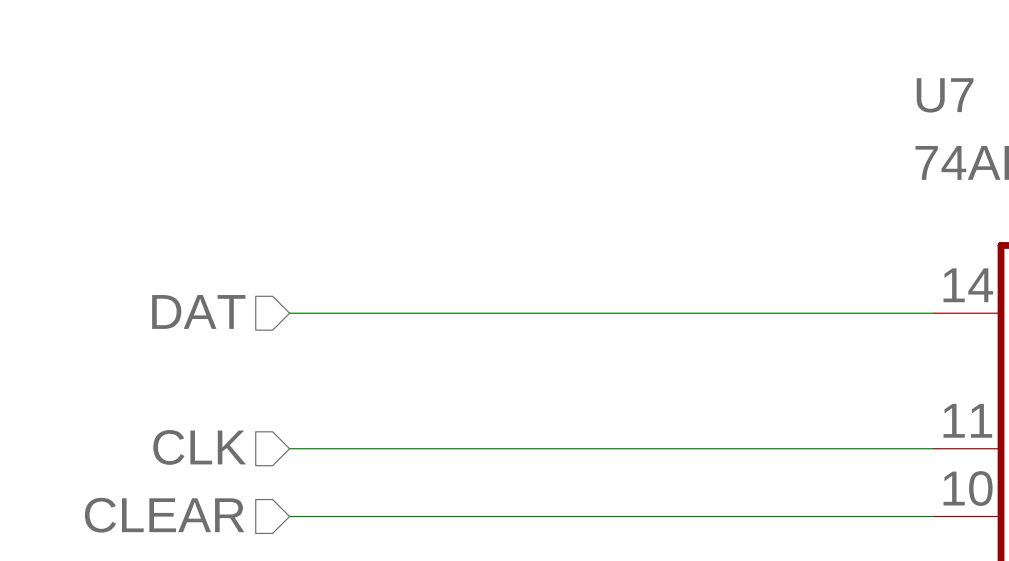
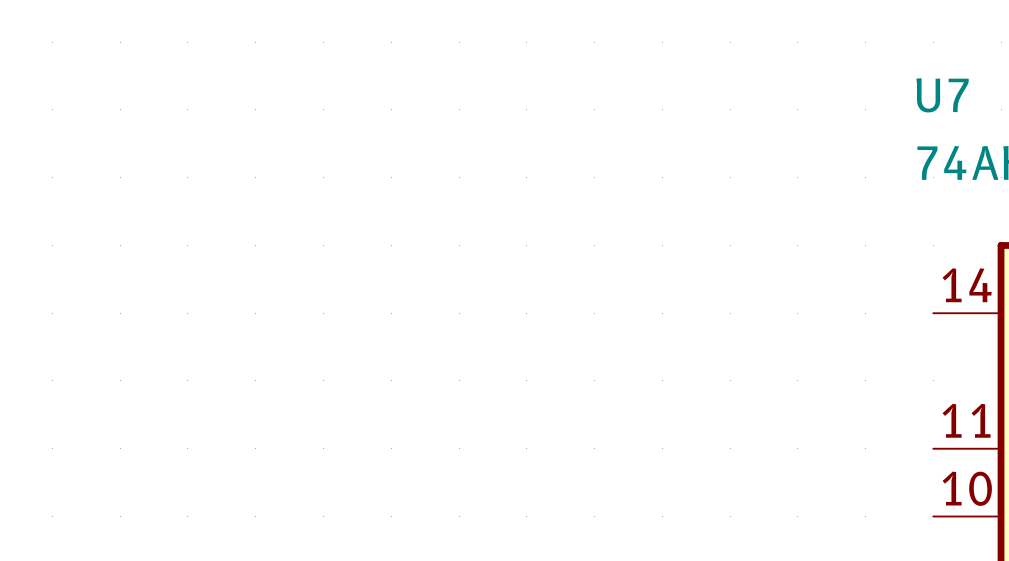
hierarchical label: DAT (198, 311) -> none
wire: (289, 313) (933, 313) -> none
hierarchical label: CLK (199, 447) -> none
wire: (289, 448) (933, 448) -> none
hierarchical label: CLEAR (164, 515) -> none
wire: (289, 516) (933, 516) -> none

